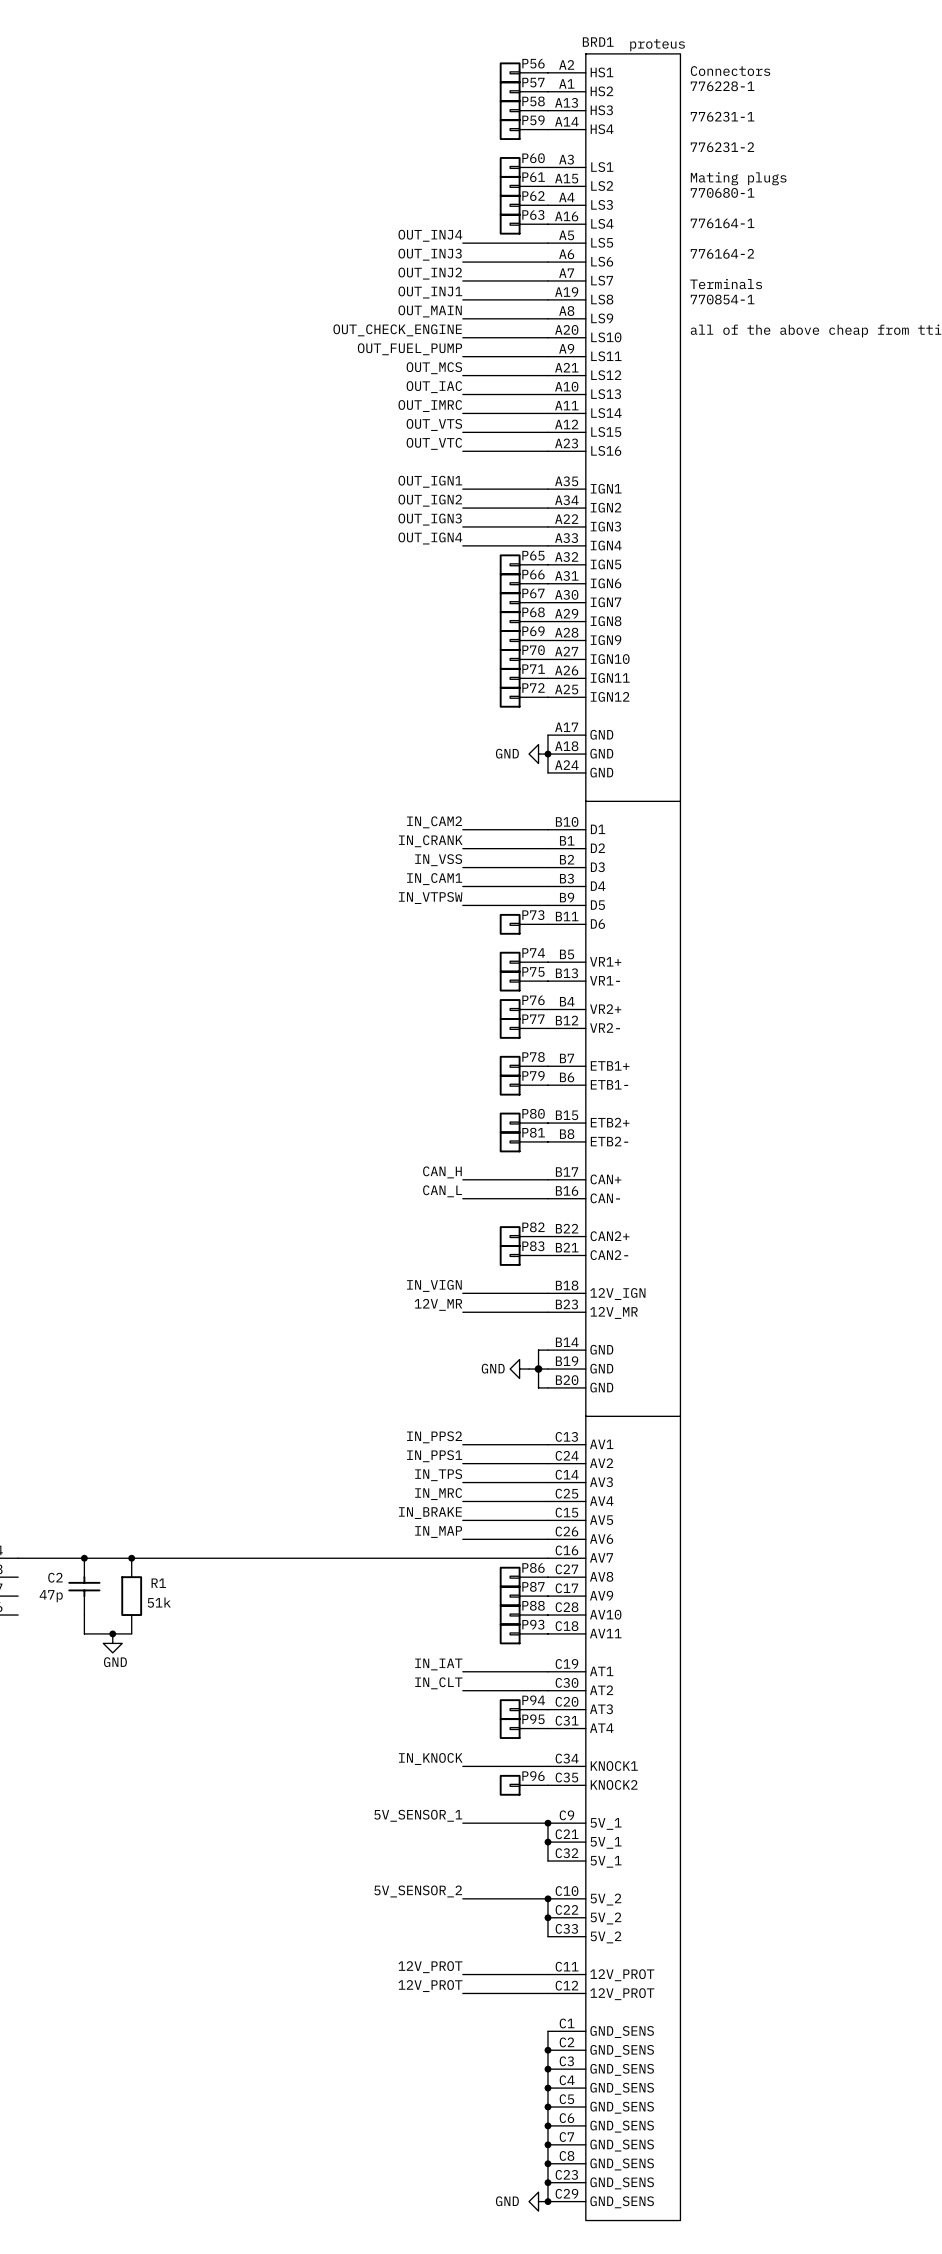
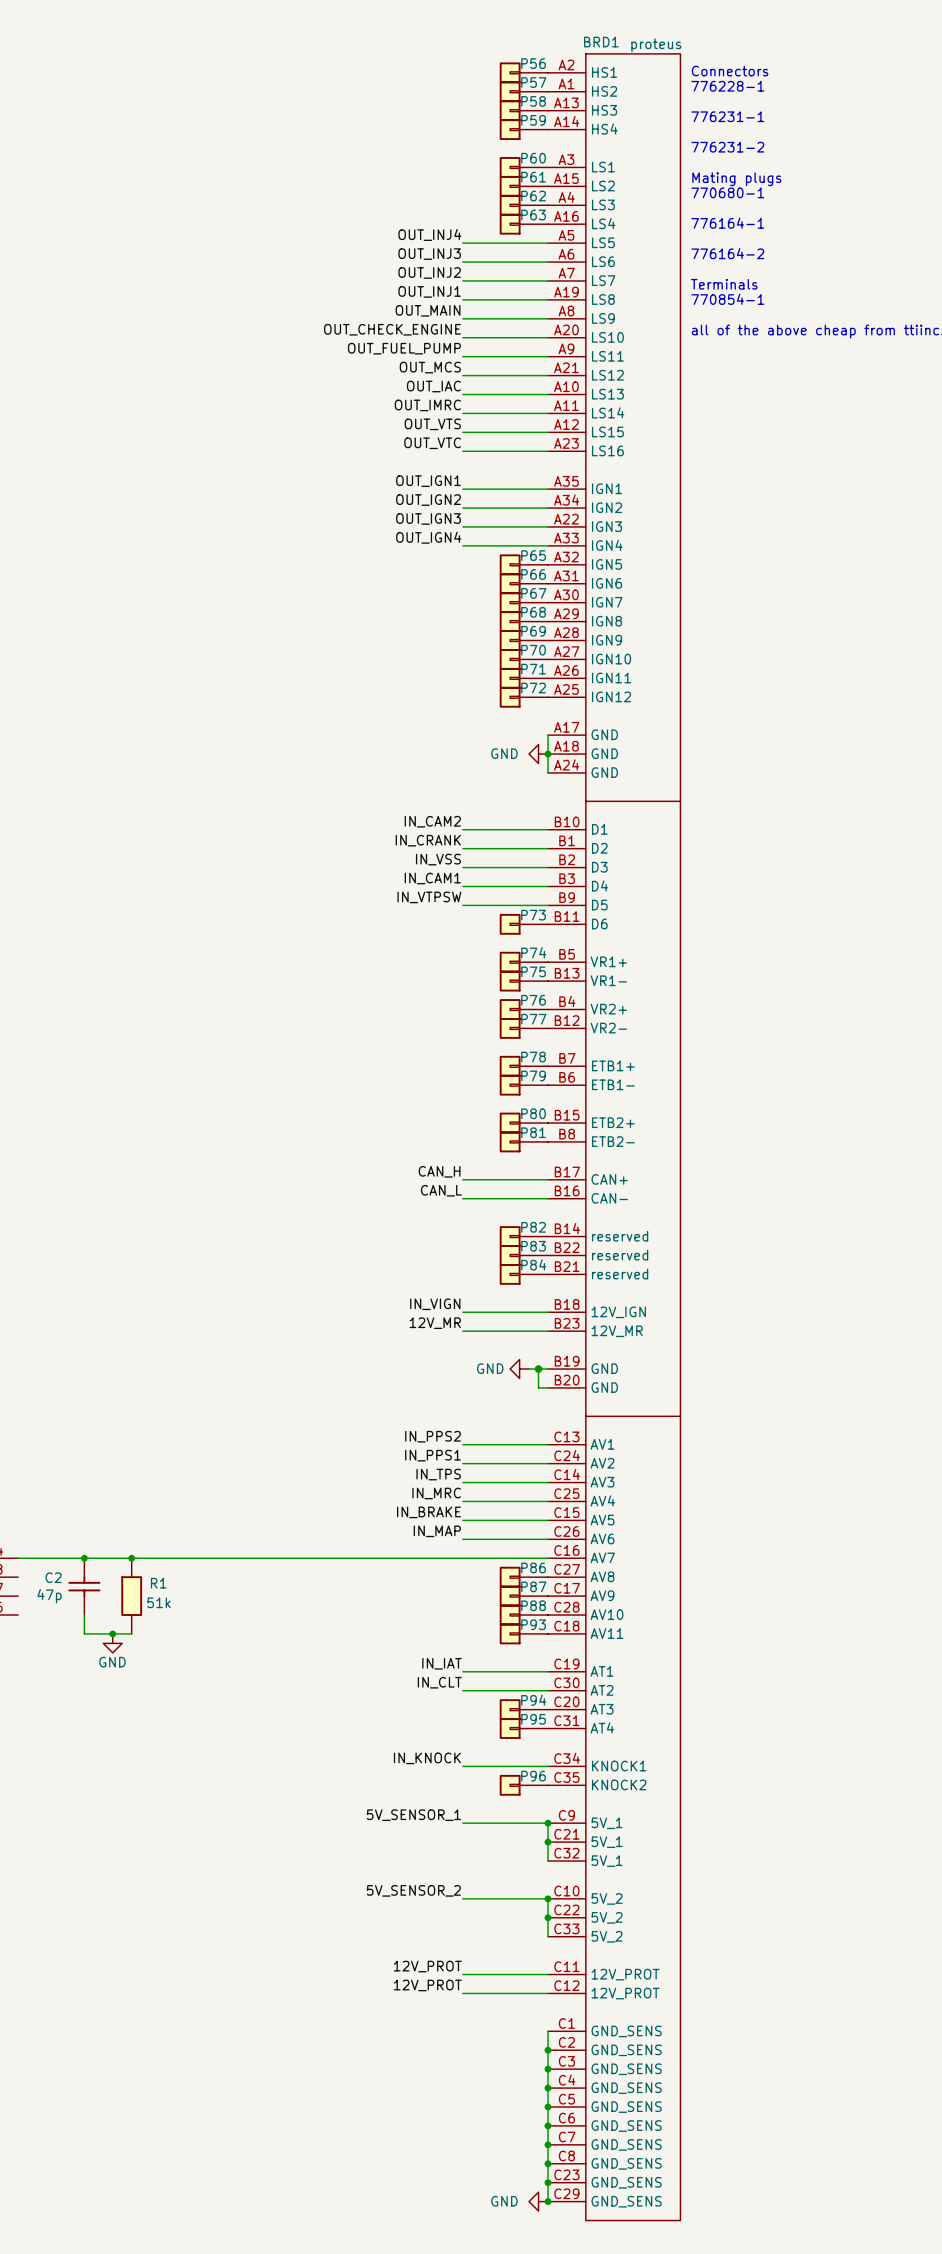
BRD1 symbol: [547, 53, 682, 2222] -> [547, 53, 682, 2222]
P84: none -> (523, 1274)
label: IN_VIGN (434, 1285) -> none
wire: (462, 1293) (547, 1293) -> (462, 1331) (547, 1331)
label: 12V_MR (438, 1304) -> IN_VIGN (435, 1304)
label: none -> 12V_MR (435, 1323)
wire: (547, 1350) (538, 1350) (538, 1369) -> none

